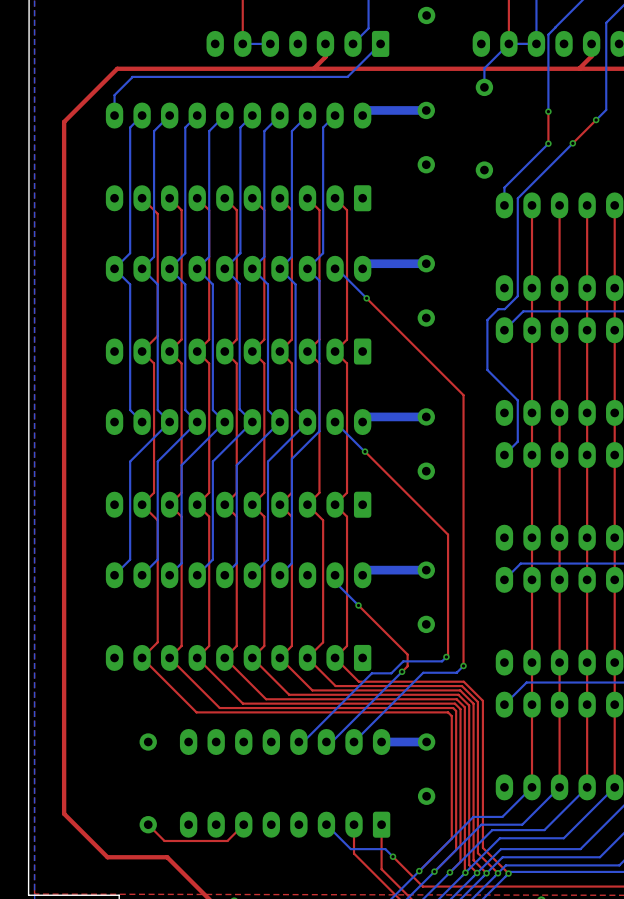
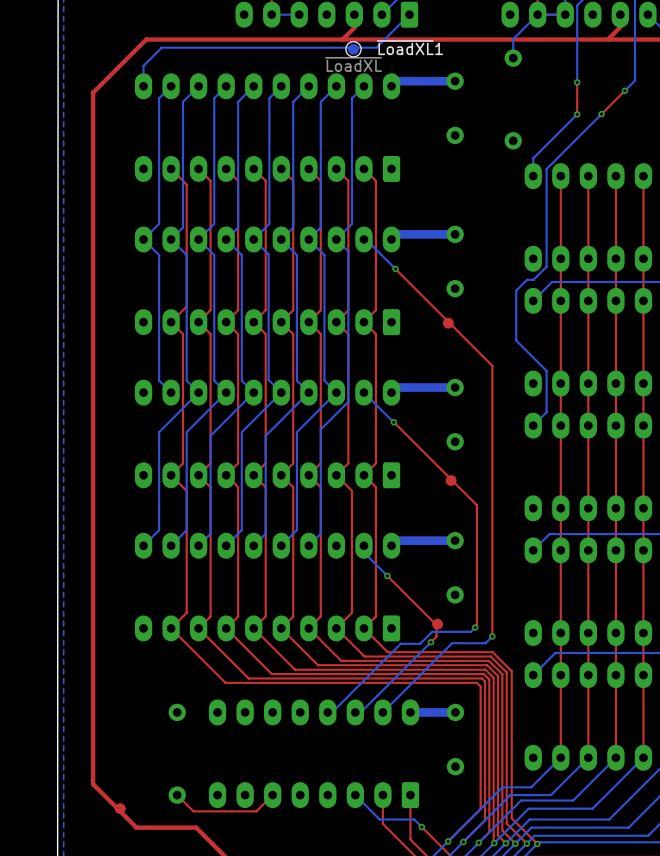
~{LoadXL}1: none -> ~{LoadXL} (353, 49)
part: none -> (448, 323)
part: none -> (451, 480)
part: none -> (437, 624)
part: none -> (120, 808)

